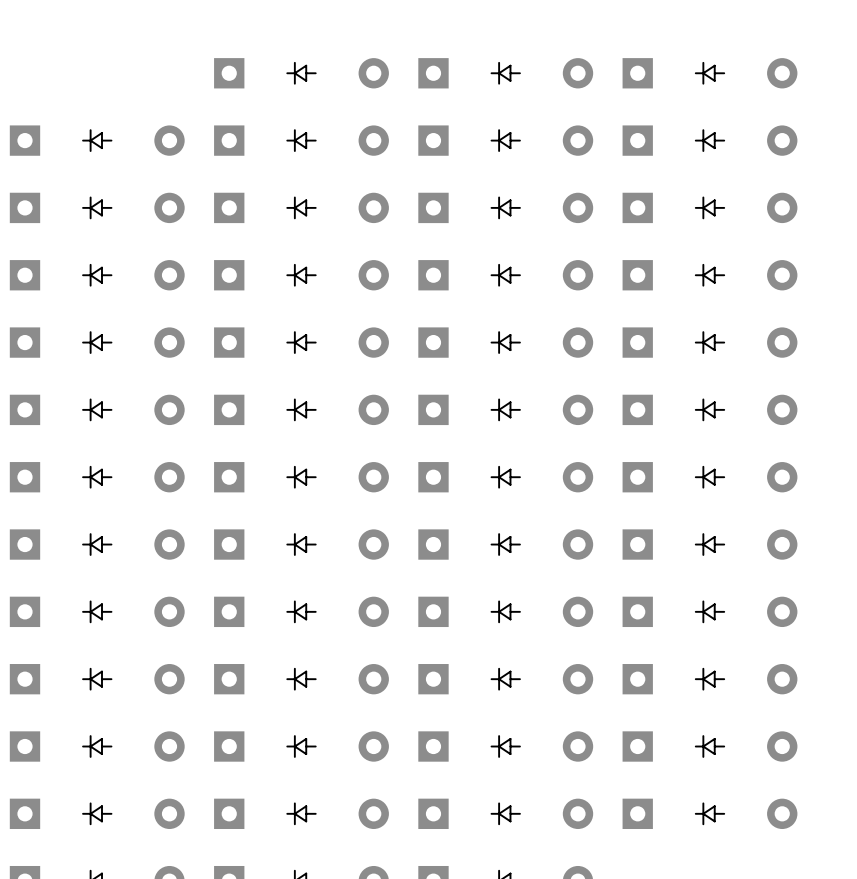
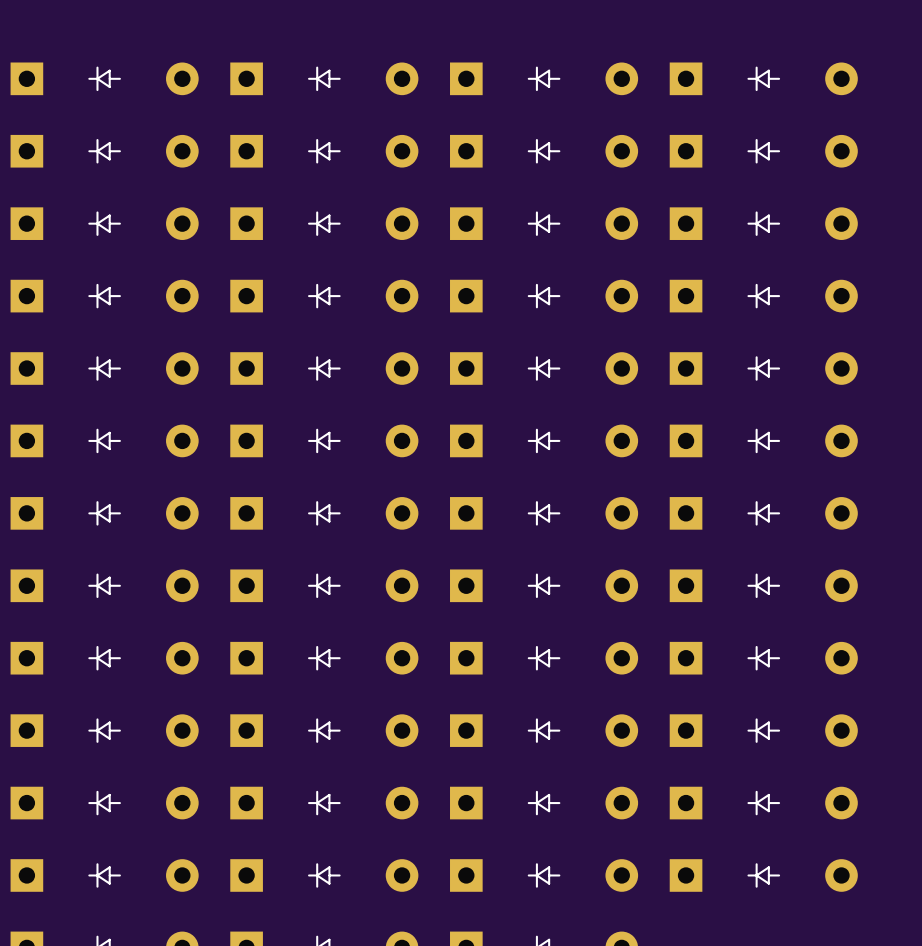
part: none -> (104, 78)

